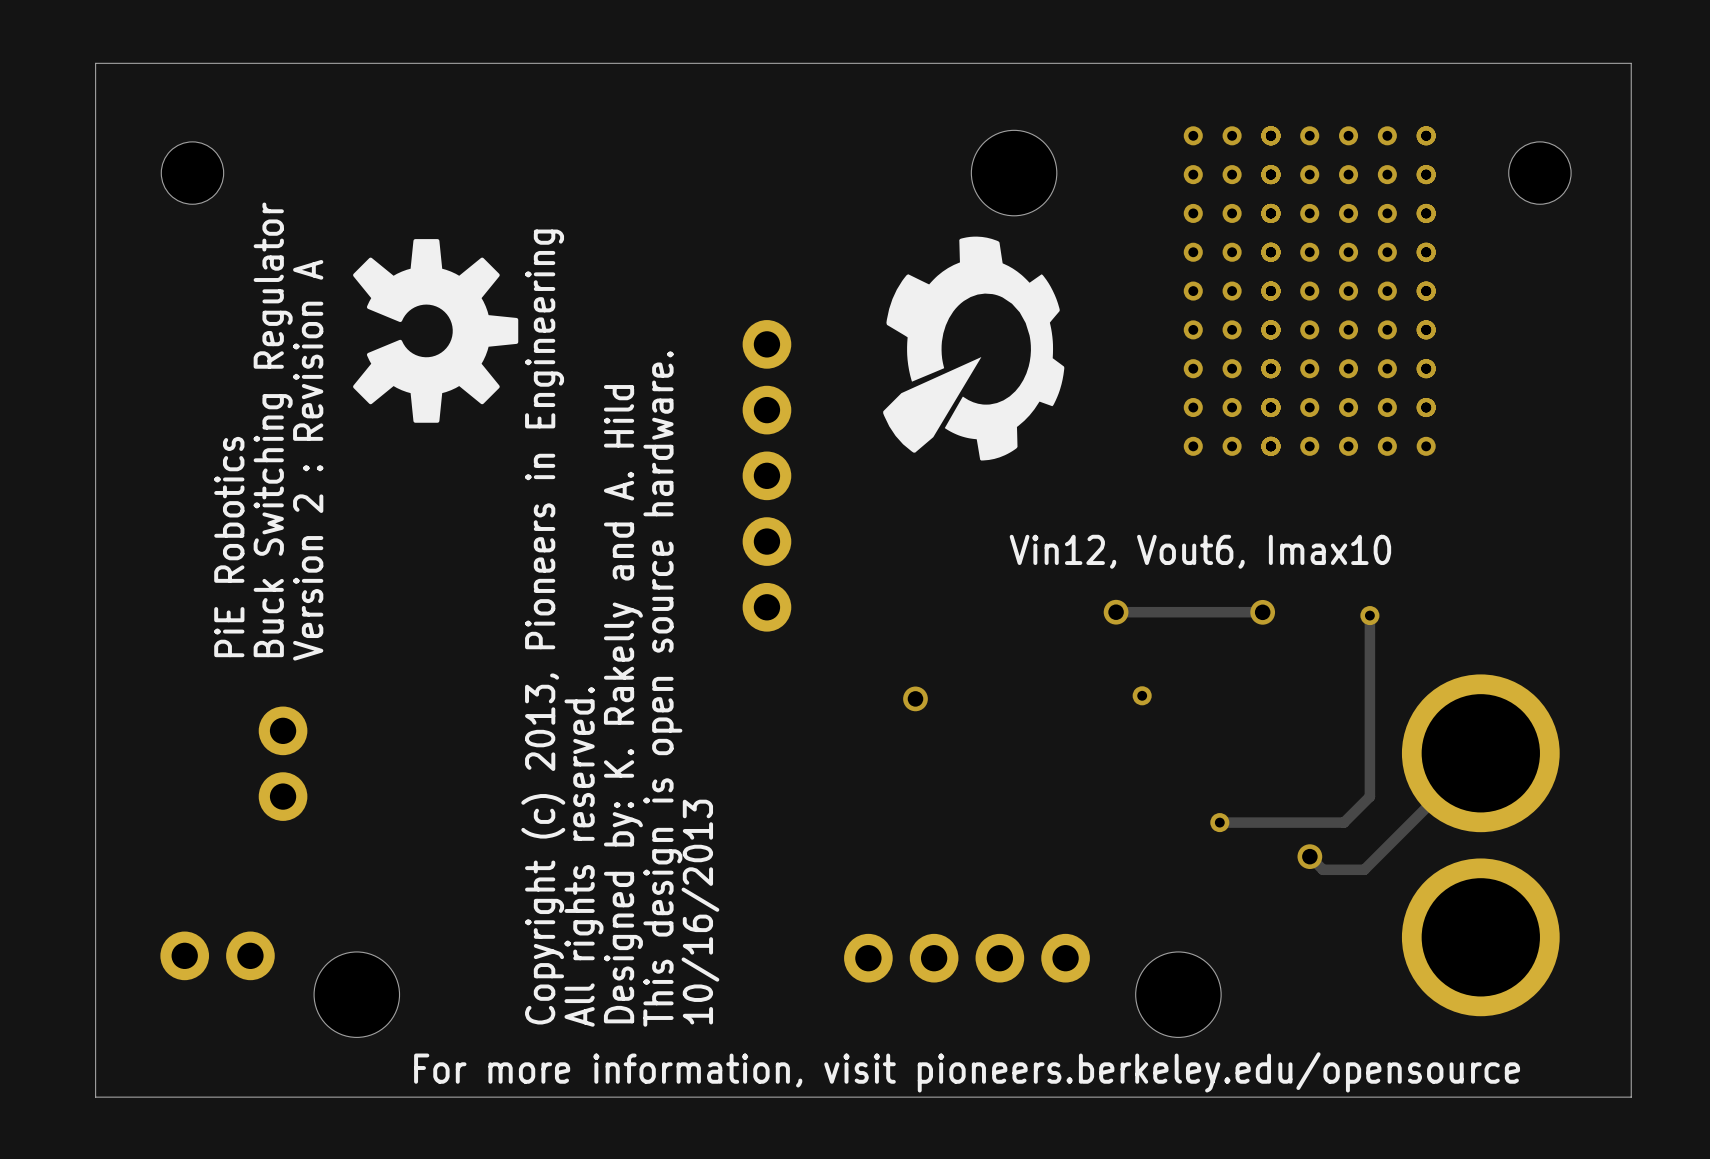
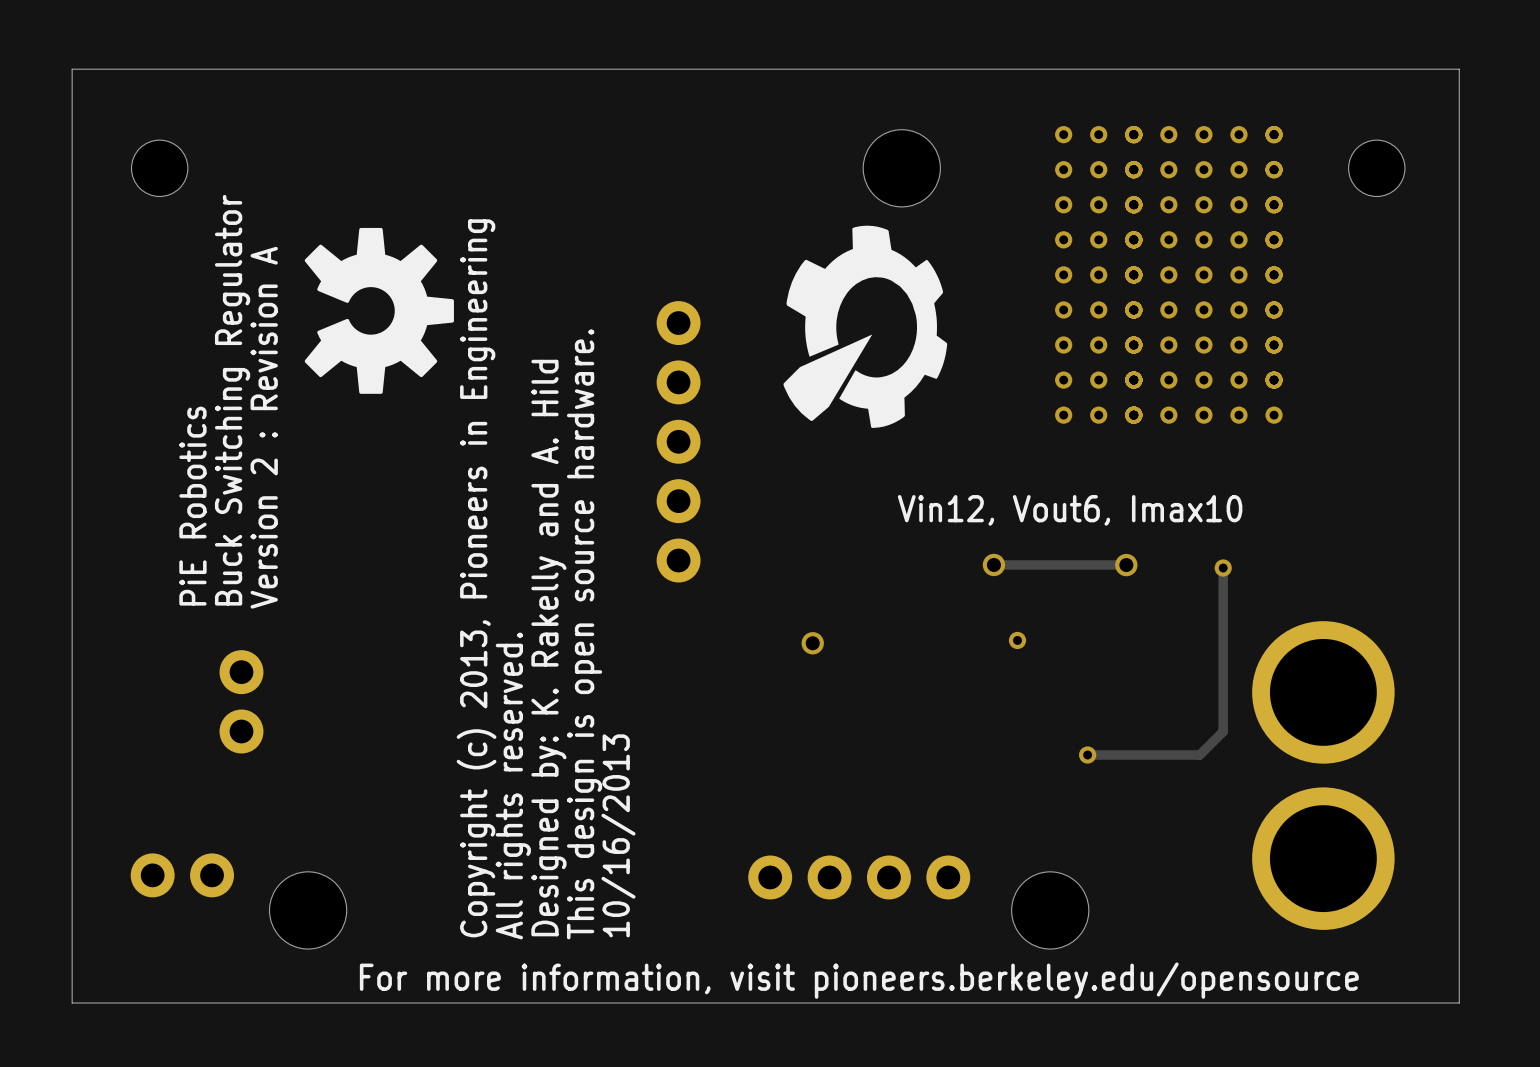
track: (1480, 753) (1364, 869) (1323, 869) (1309, 856) -> none
via: (1309, 856) -> none

